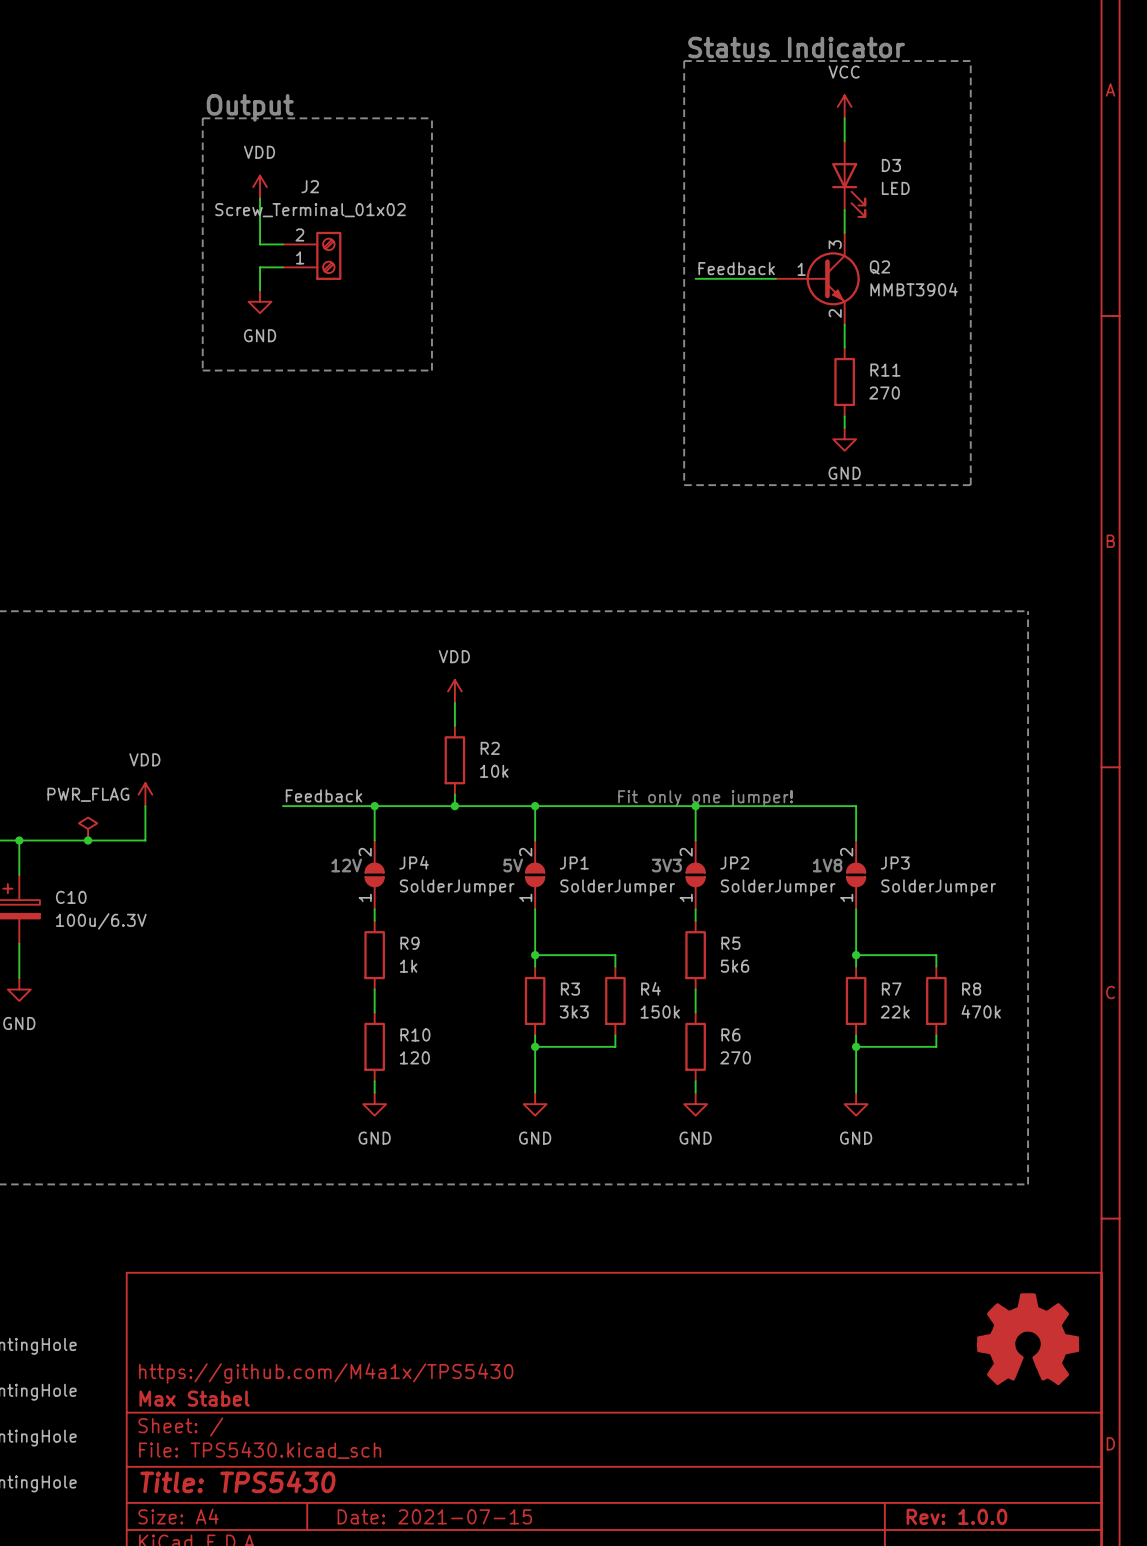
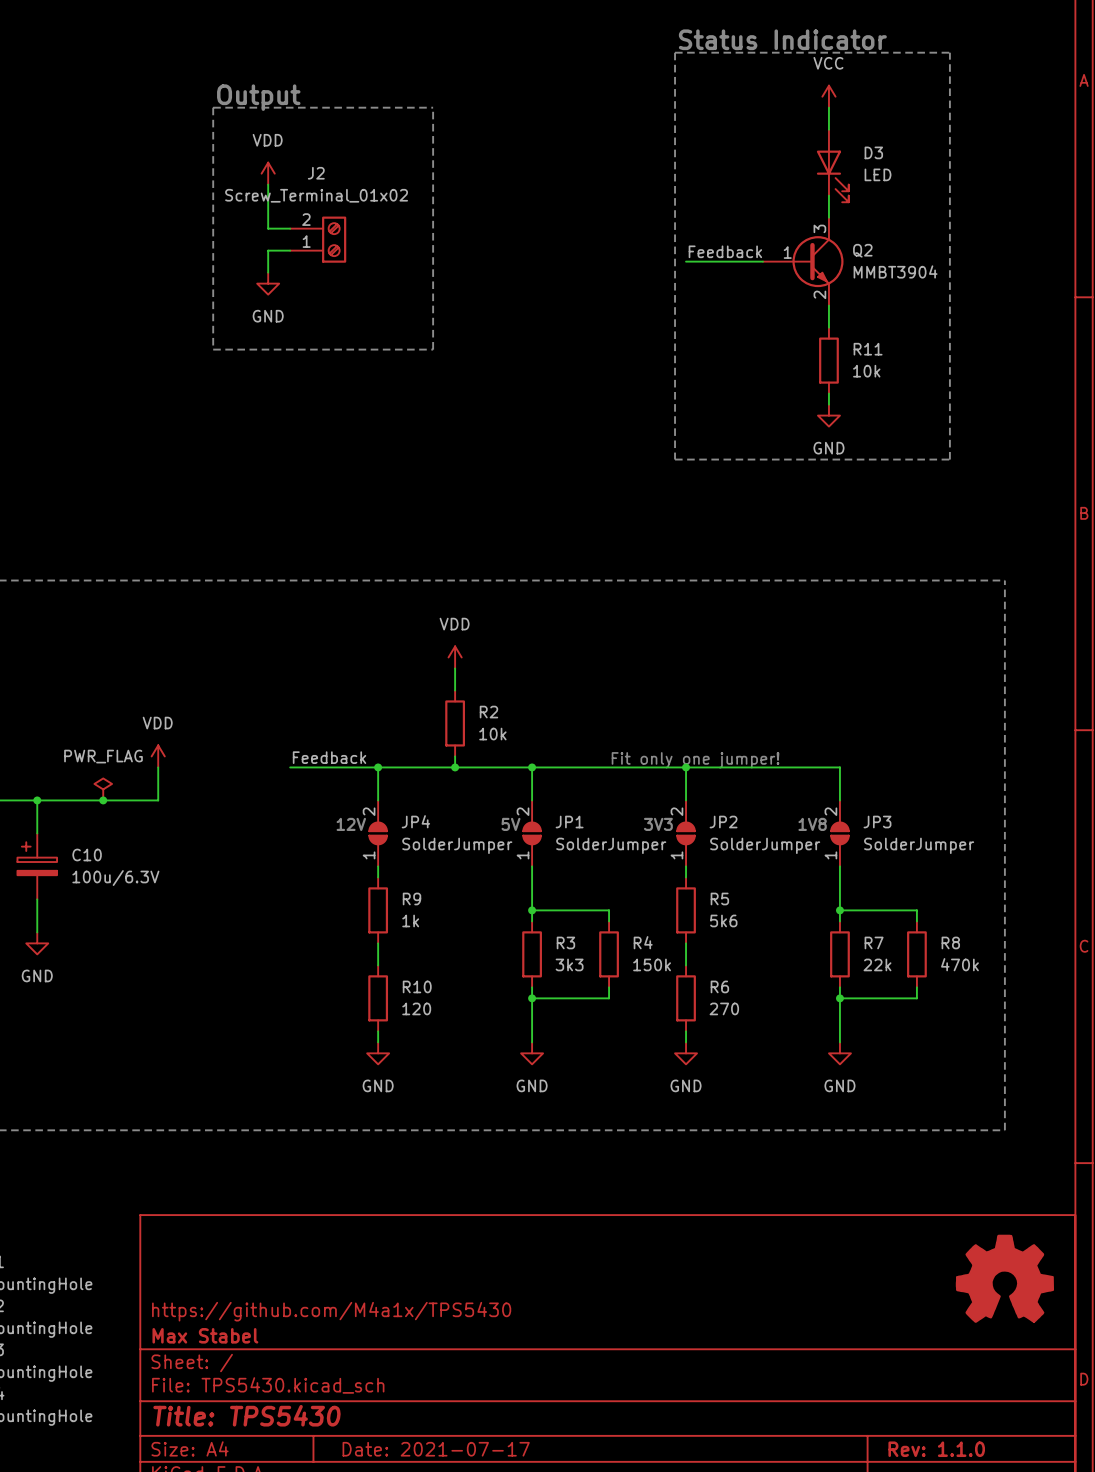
R11 value: 270 (884, 393) -> 10k (866, 371)
title block: Date: 2021-07-15 (434, 1516) -> Date: 2021-07-17 (436, 1449)
title block: Rev: 1.0.0 (956, 1516) -> Rev: 1.1.0 (936, 1449)

